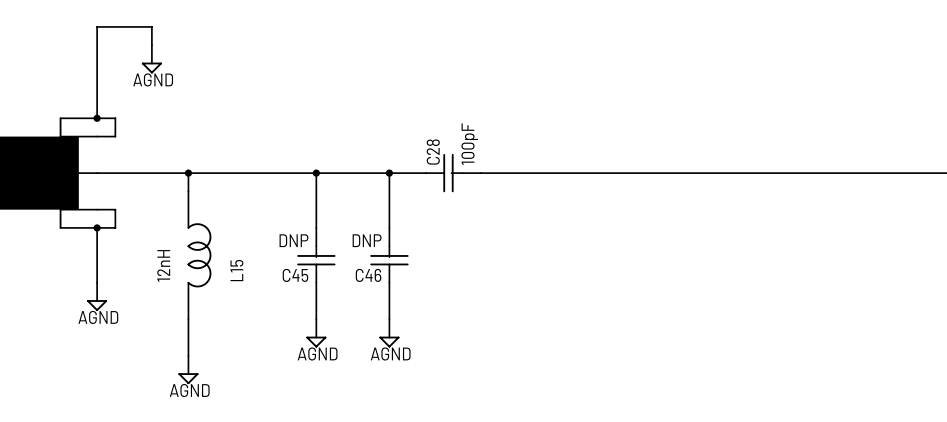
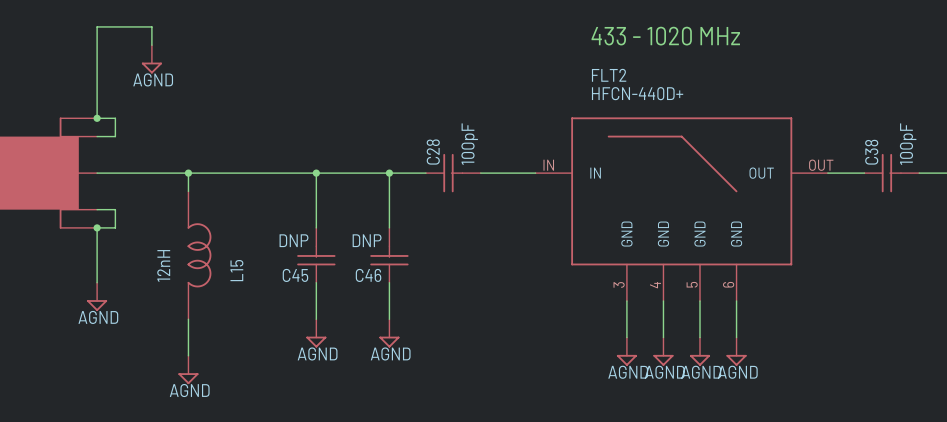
text: none -> 433 - 1020 MHz (665, 36)
wire: (535, 173) (827, 173) -> none
C38: none -> 100pF (891, 173)
FLT2: none -> HFCN-440D+ (681, 209)
wire: none -> (626, 301) (626, 337)
wire: none -> (663, 301) (663, 337)
wire: none -> (700, 301) (700, 337)
wire: none -> (736, 301) (736, 337)
power symbol: none -> AGND (626, 351)
power symbol: none -> AGND (663, 351)
power symbol: none -> AGND (700, 351)
power symbol: none -> AGND (736, 351)

